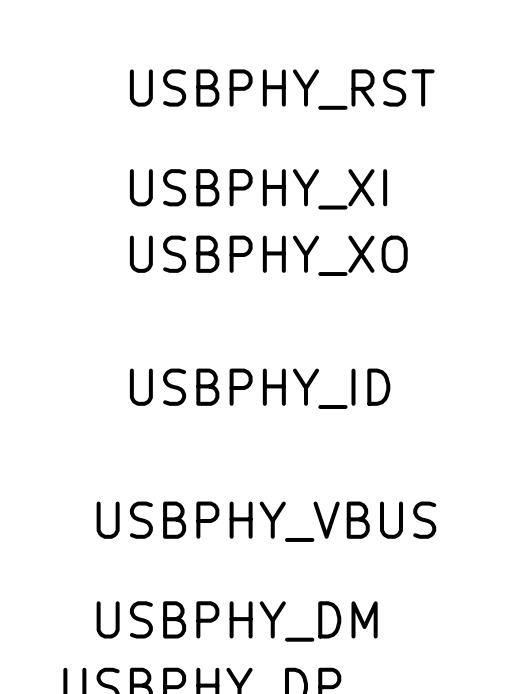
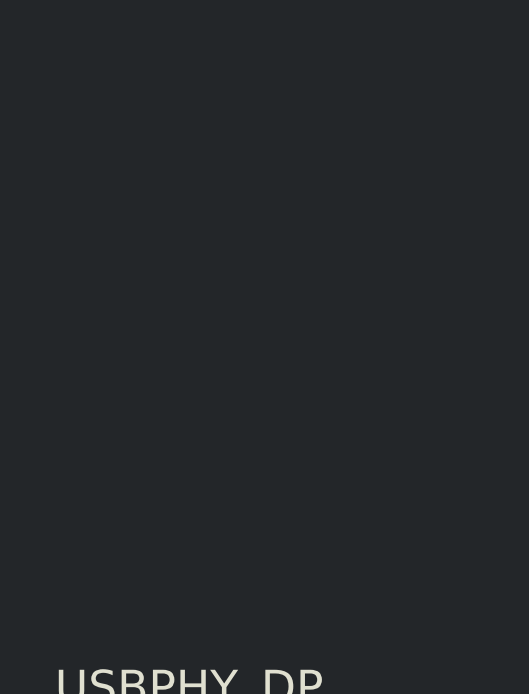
label: USBPHY_RST (282, 89) -> none
label: USBPHY_XI (258, 189) -> none
label: USBPHY_XO (268, 255) -> none
label: USBPHY_ID (260, 388) -> none
label: USBPHY_VBUS (266, 521) -> none
label: USBPHY_DM (237, 621) -> none

